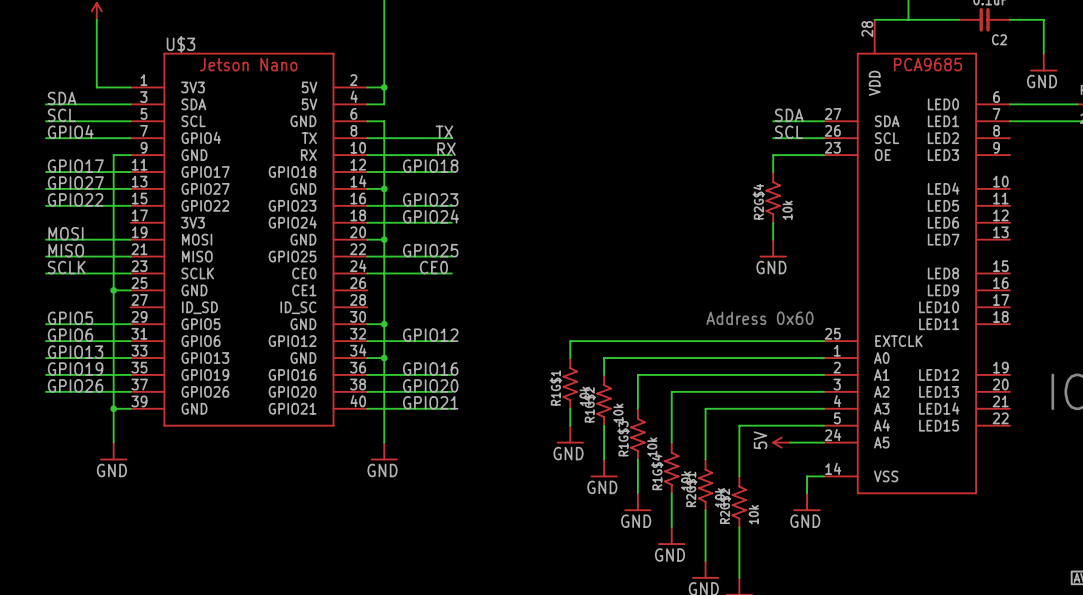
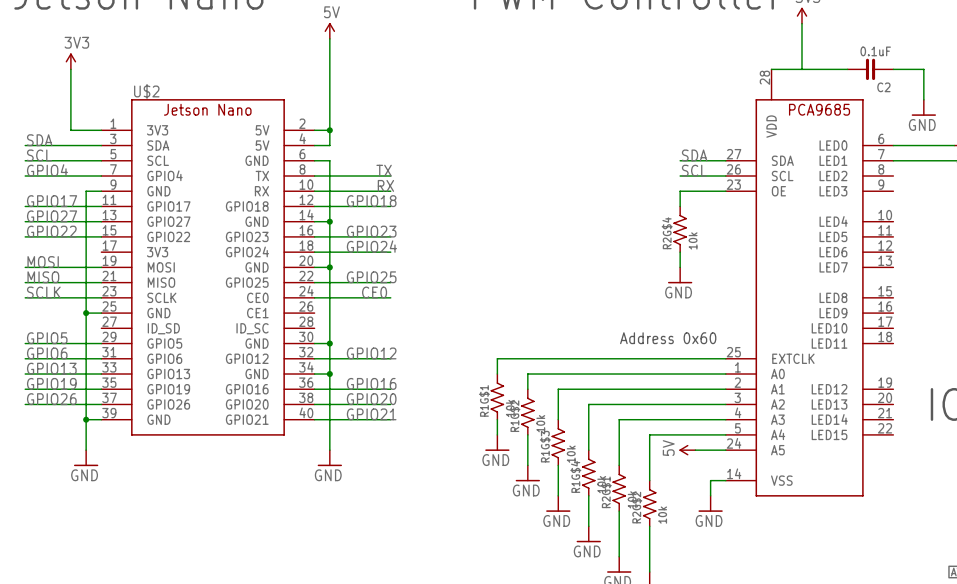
U$3 name: U$3 (181, 44) -> U$2 (146, 91)

